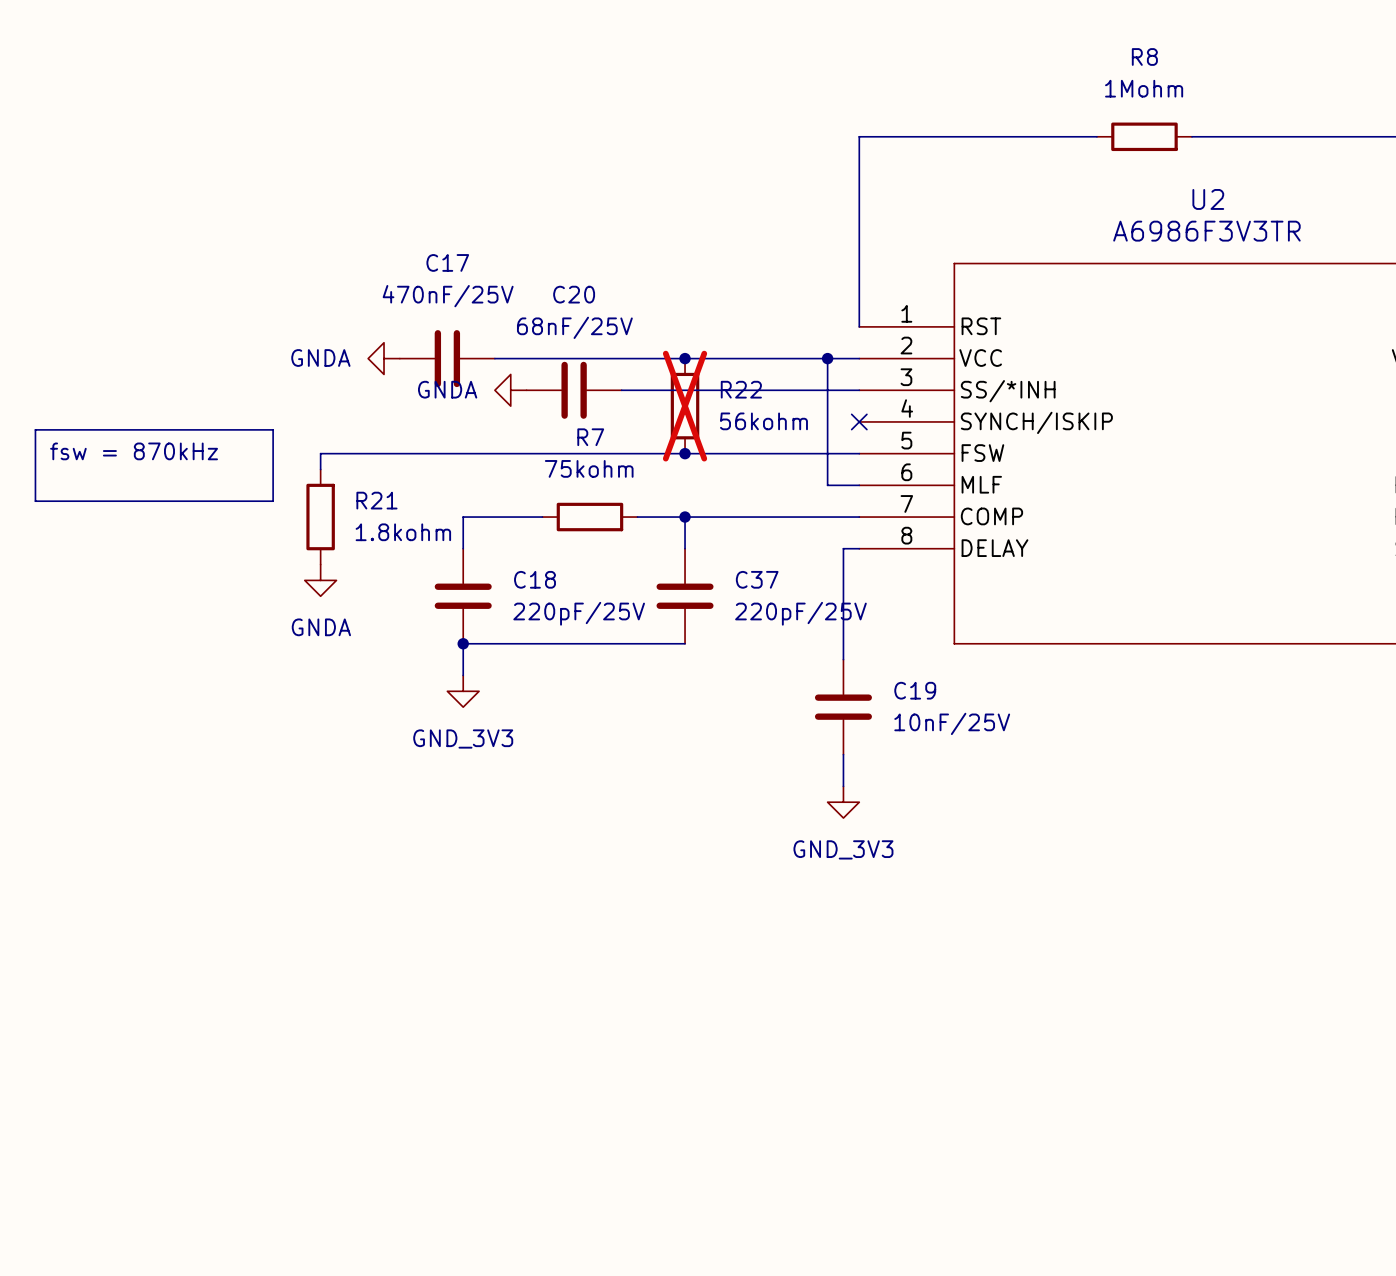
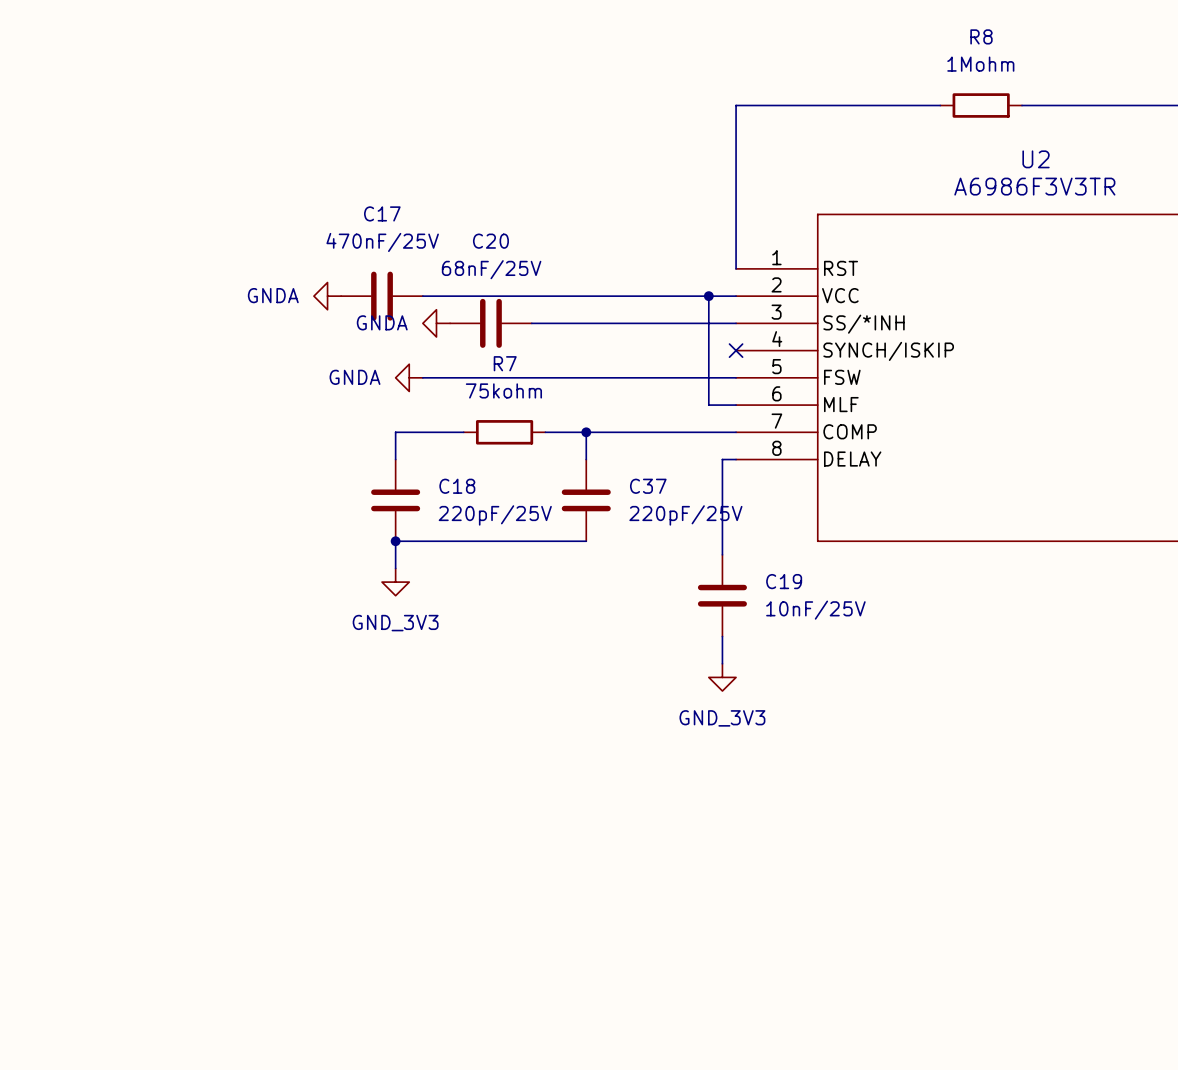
junction: (685, 358) -> none
R22: 56kohm (685, 406) -> none
line: (35, 429) (273, 429) (273, 501) (35, 501) (35, 429) -> none
text: fsw = 870kHz (134, 451) -> none
wire: (494, 453) (320, 453) (320, 469) -> none
junction: (685, 453) -> none
R21: 1.8kohm (320, 517) -> none
power symbol rotation: 0° (320, 580) -> 90° clockwise (409, 377)
power symbol position: GNDA (320, 580) -> GNDA (409, 377)

